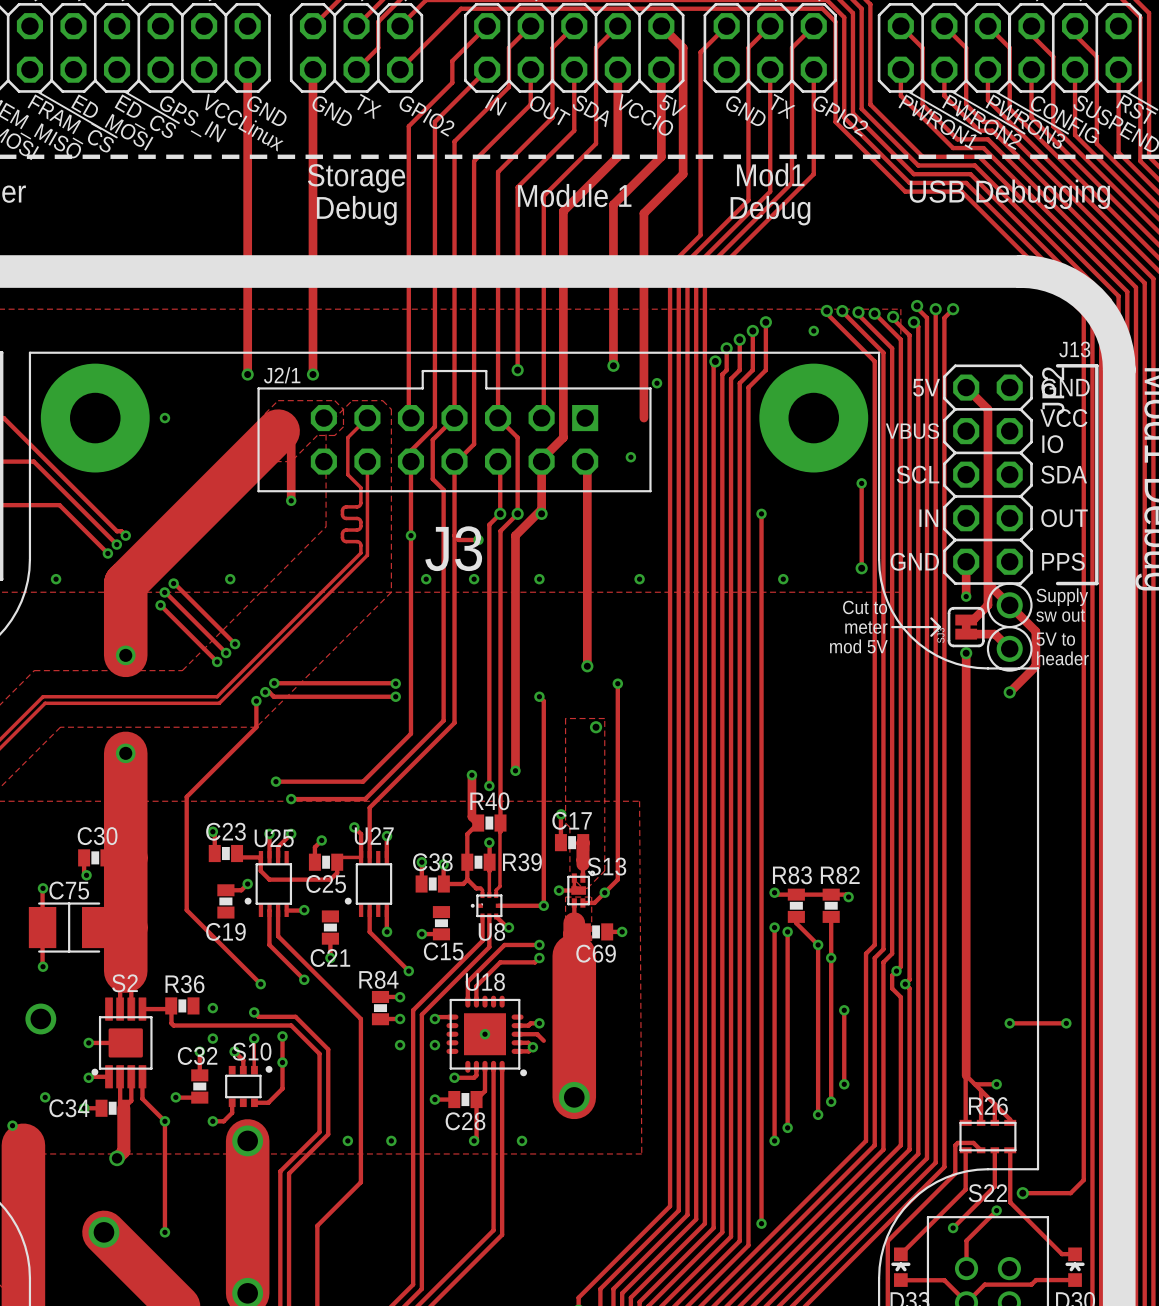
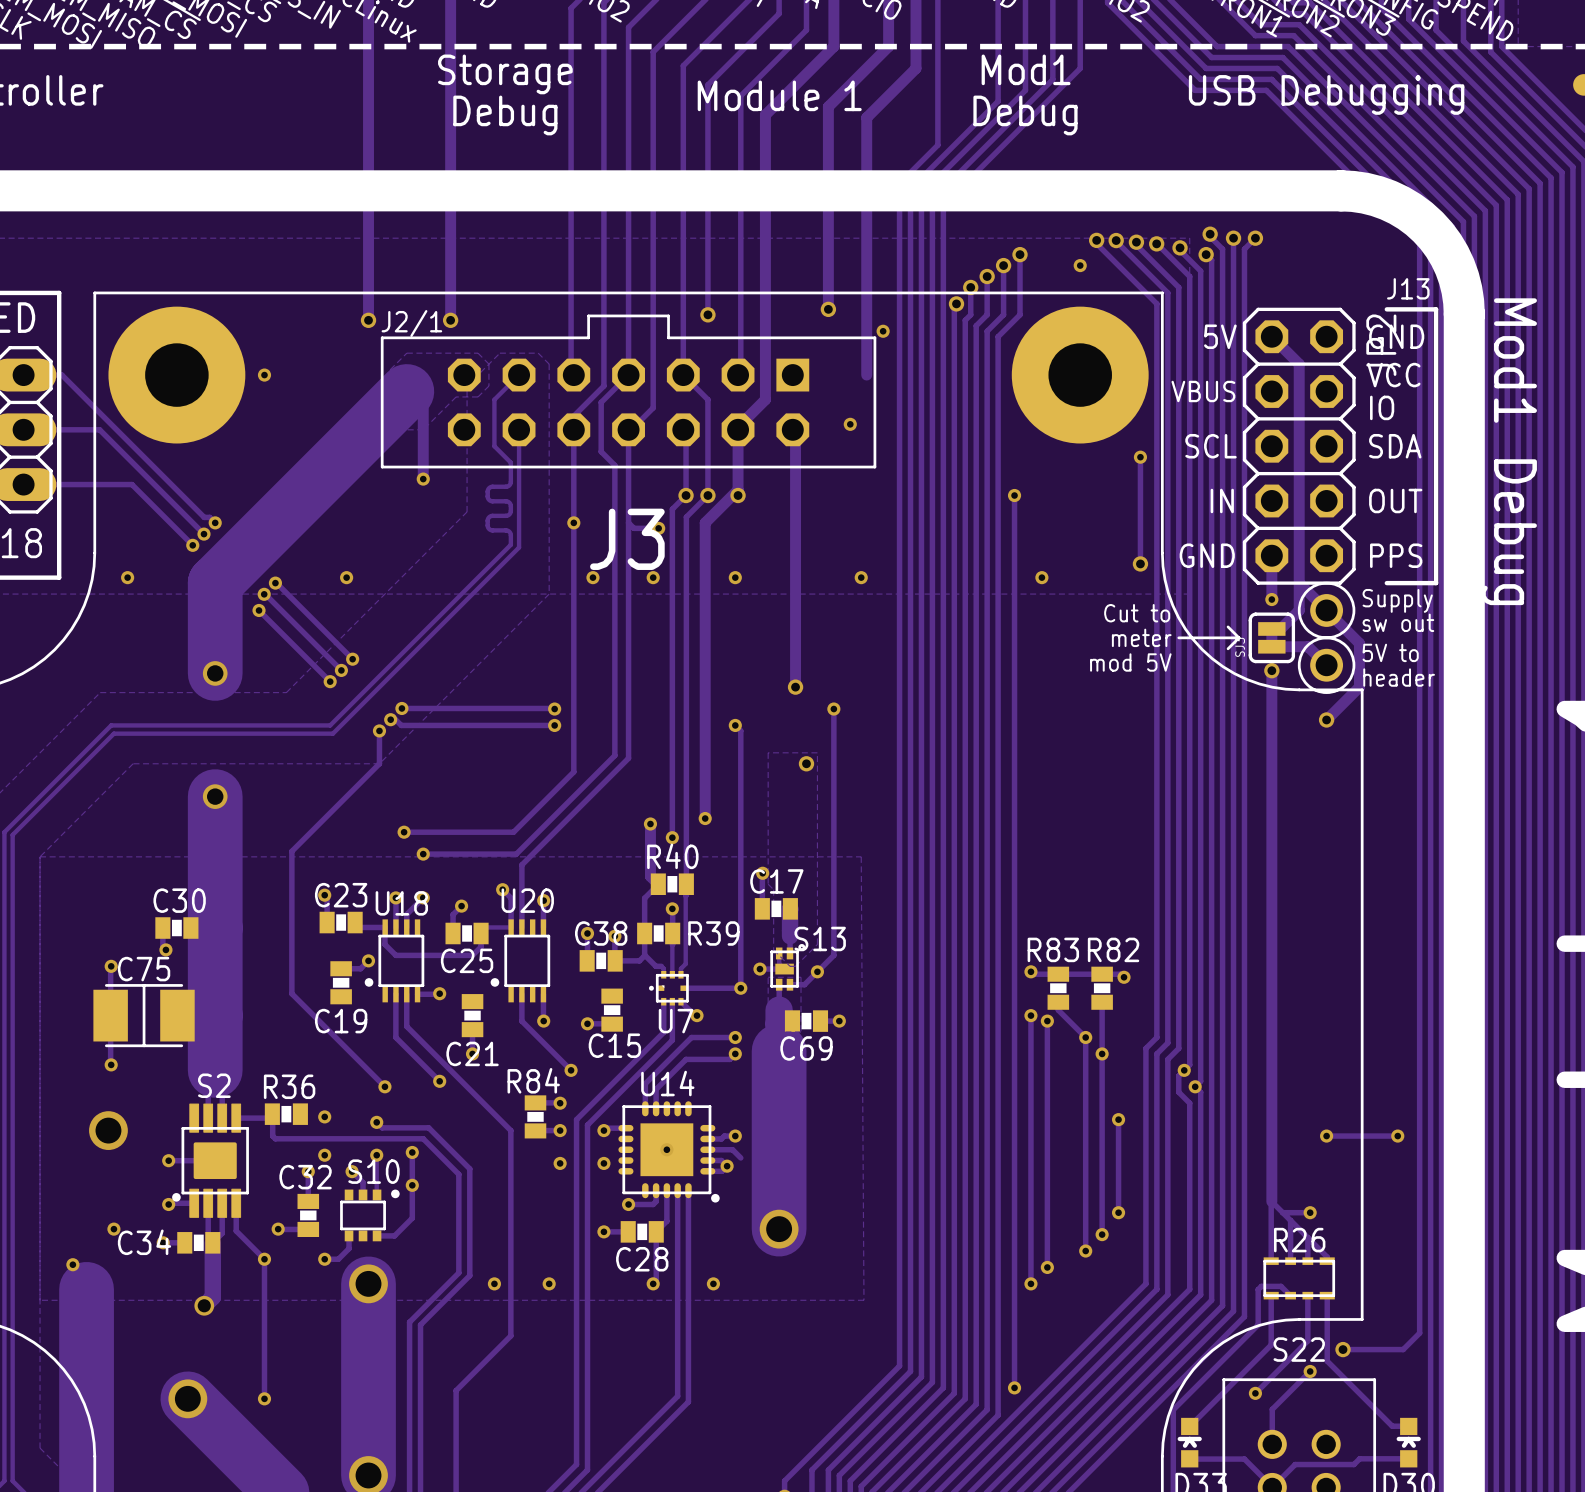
U27 name: U27 (374, 836) -> U20 (527, 900)
U25 name: U25 (274, 838) -> U18 (401, 903)
U8 name: U8 (491, 931) -> U7 (676, 1021)
U18 name: U18 (485, 981) -> U14 (667, 1083)

